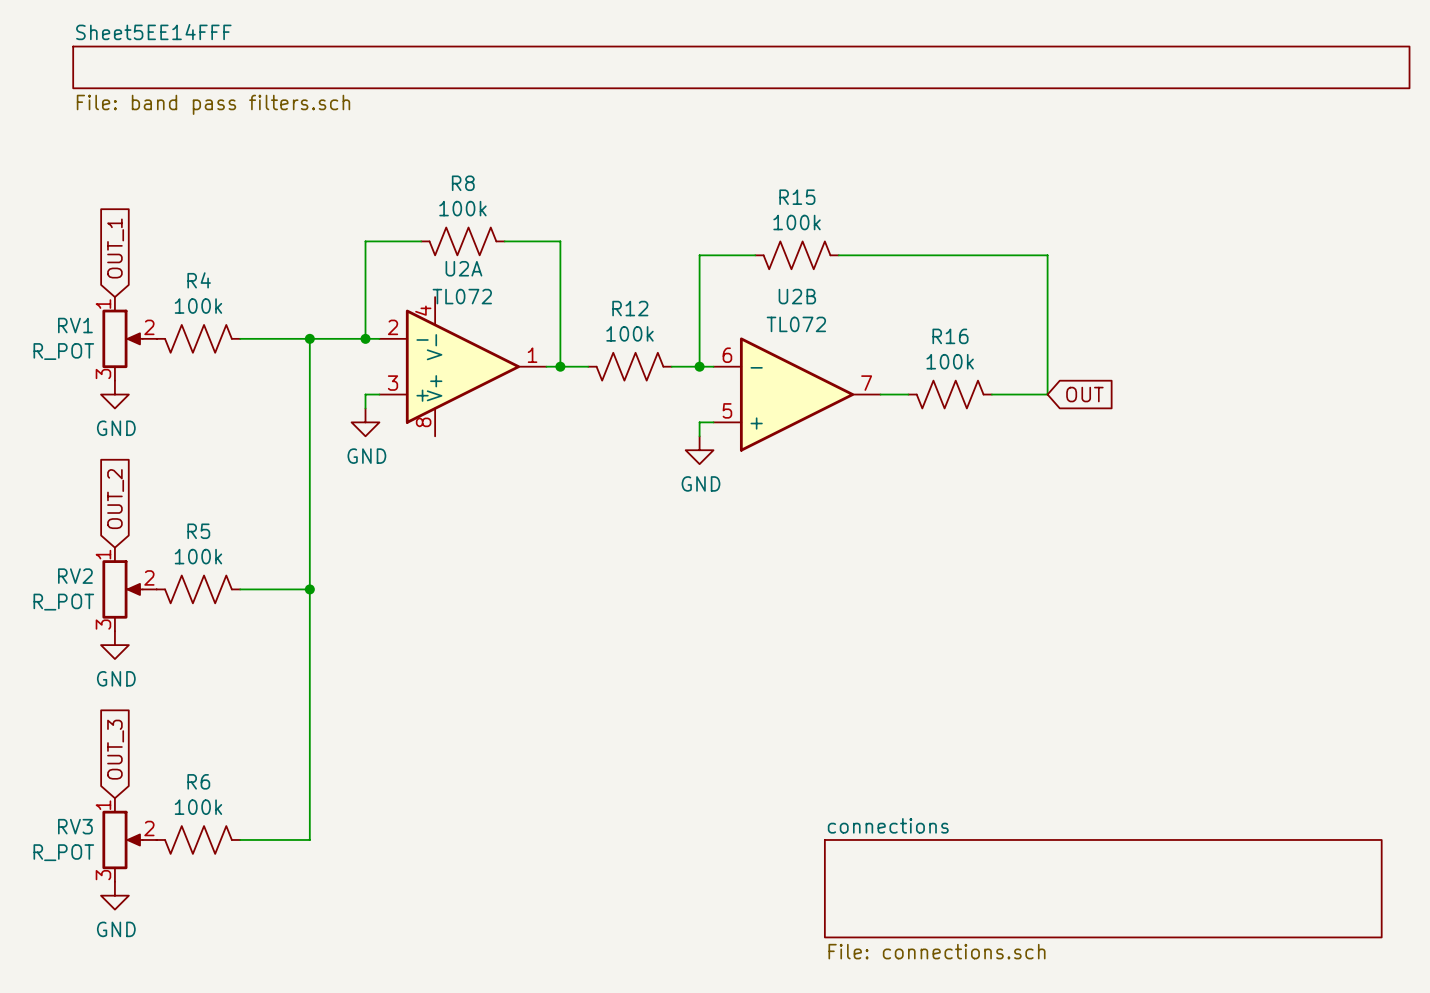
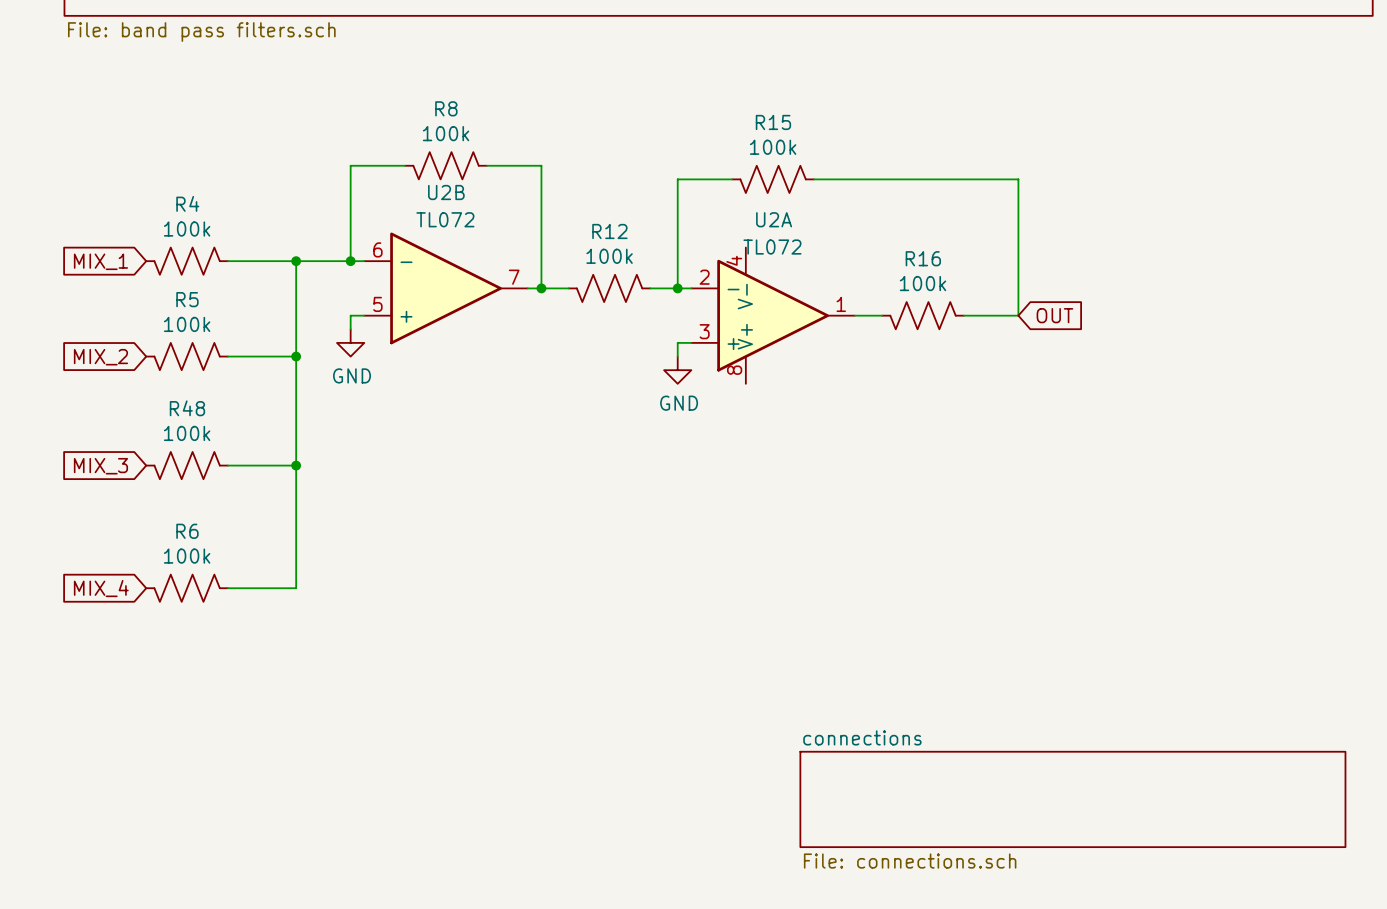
global label: OUT_1 (115, 248) -> none
RV1: R_POT (129, 338) -> none
global label: none -> MIX_1 (100, 261)
U2A position: (462, 366) -> (773, 315)
power symbol: GND (114, 394) -> none
U2B position: (797, 394) -> (446, 288)
global label: none -> MIX_2 (100, 357)
wire: none -> (228, 356) (296, 356)
junction: none -> (296, 356)
global label: OUT_2 (115, 499) -> none
R48: none -> 100k (187, 465)
global label: none -> MIX_3 (100, 466)
RV2: R_POT (129, 589) -> none
R5 position: (198, 589) -> (187, 356)
wire: (240, 589) (309, 589) -> (228, 465) (296, 465)
junction position: (309, 589) -> (296, 465)
power symbol: GND (114, 645) -> none
wire: (309, 672) (309, 839) (240, 839) -> (296, 588) (228, 588)
global label: none -> MIX_4 (101, 588)
global label: OUT_3 (115, 749) -> none
RV3: R_POT (129, 839) -> none
R6 position: (198, 839) -> (187, 588)
power symbol: GND (114, 895) -> none

